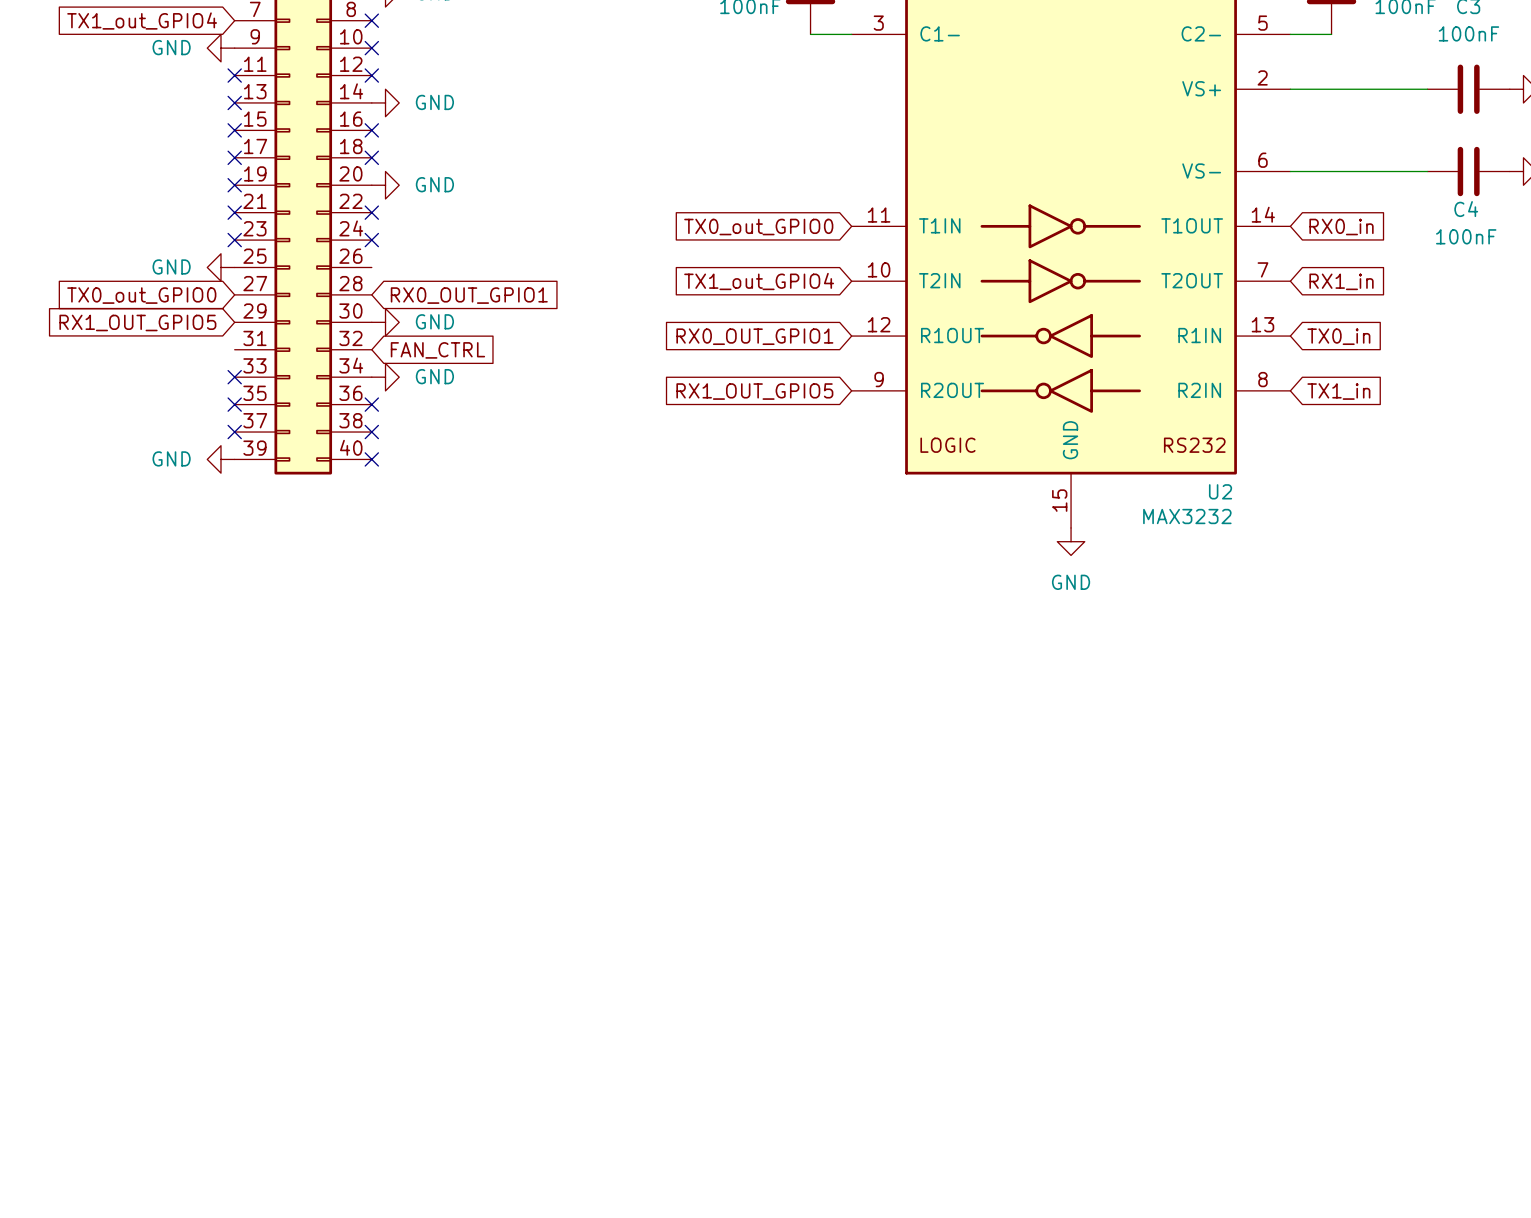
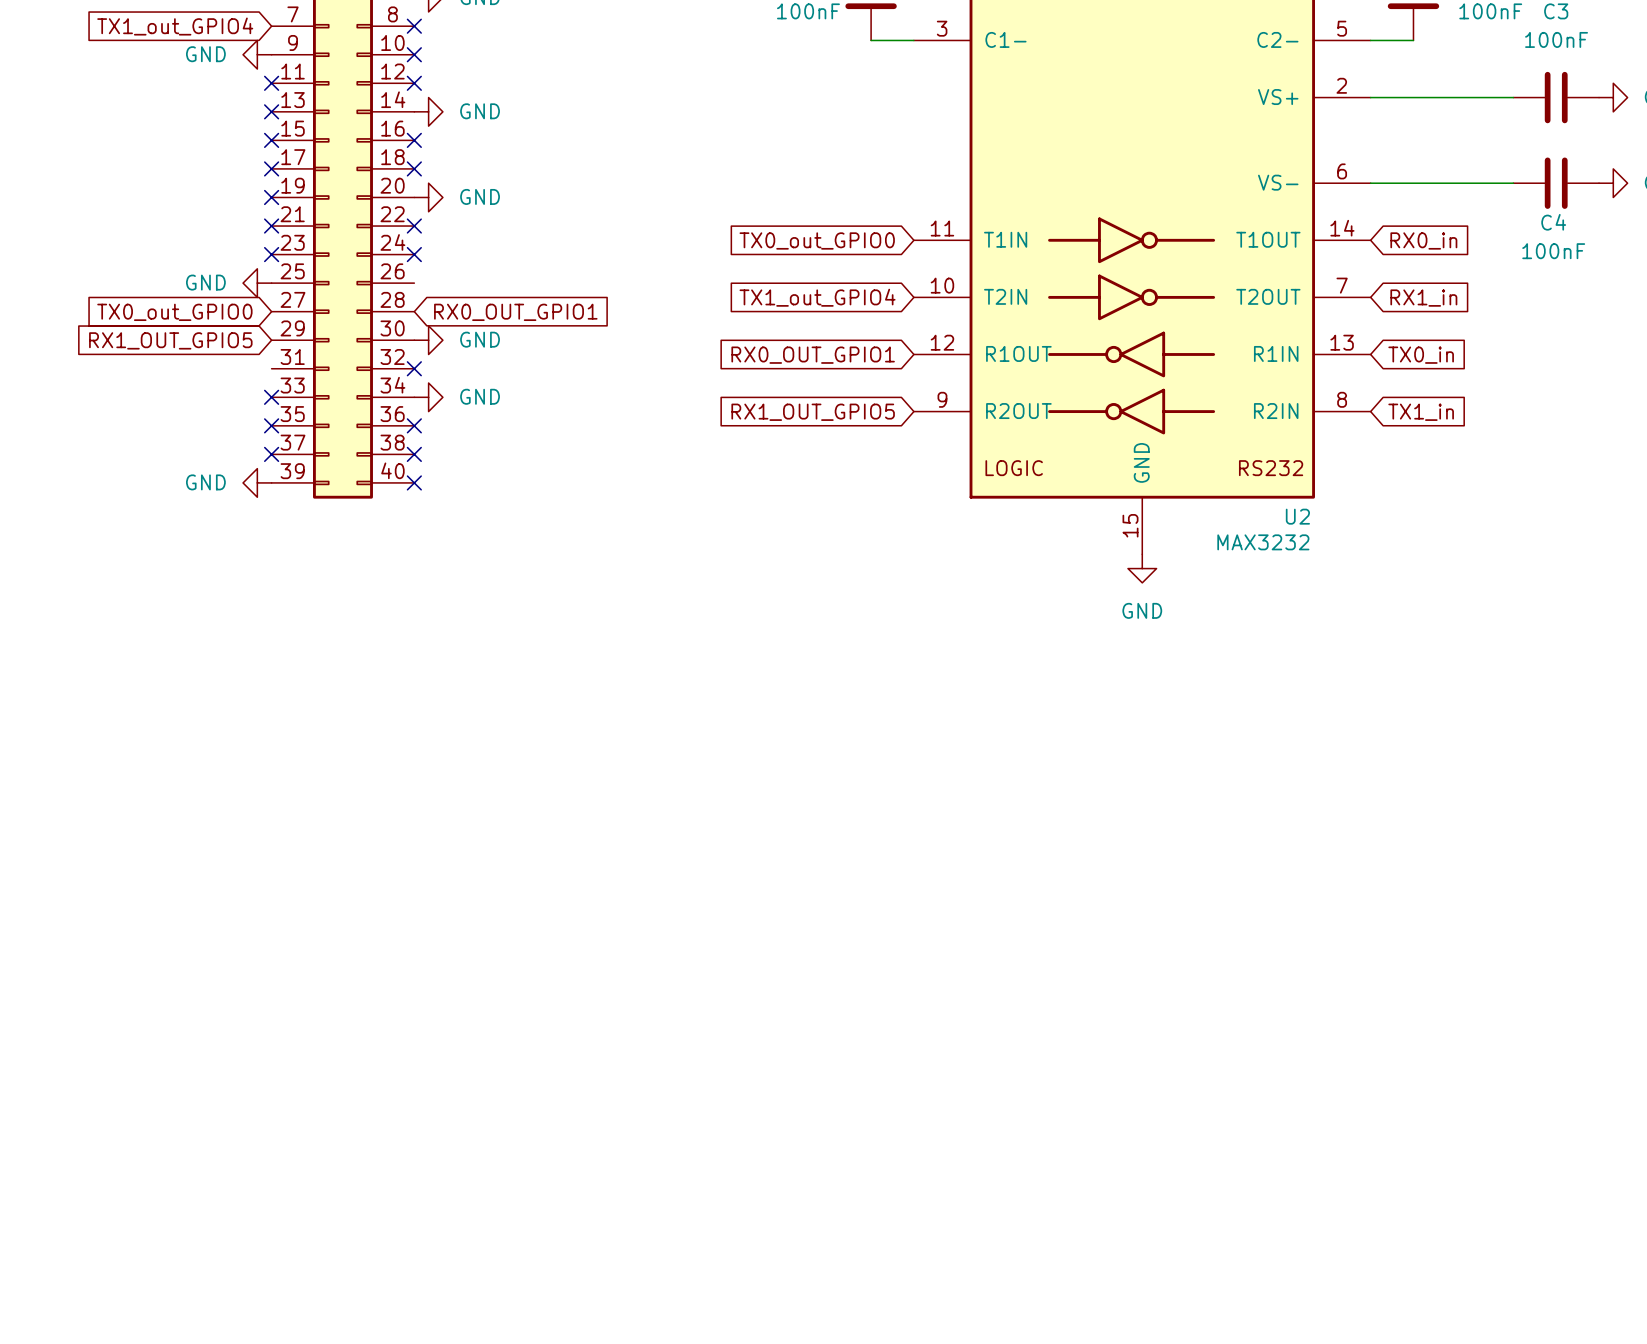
no-connect mark: none -> (414, 368)
global label: FAN_CTRL (437, 350) -> none

